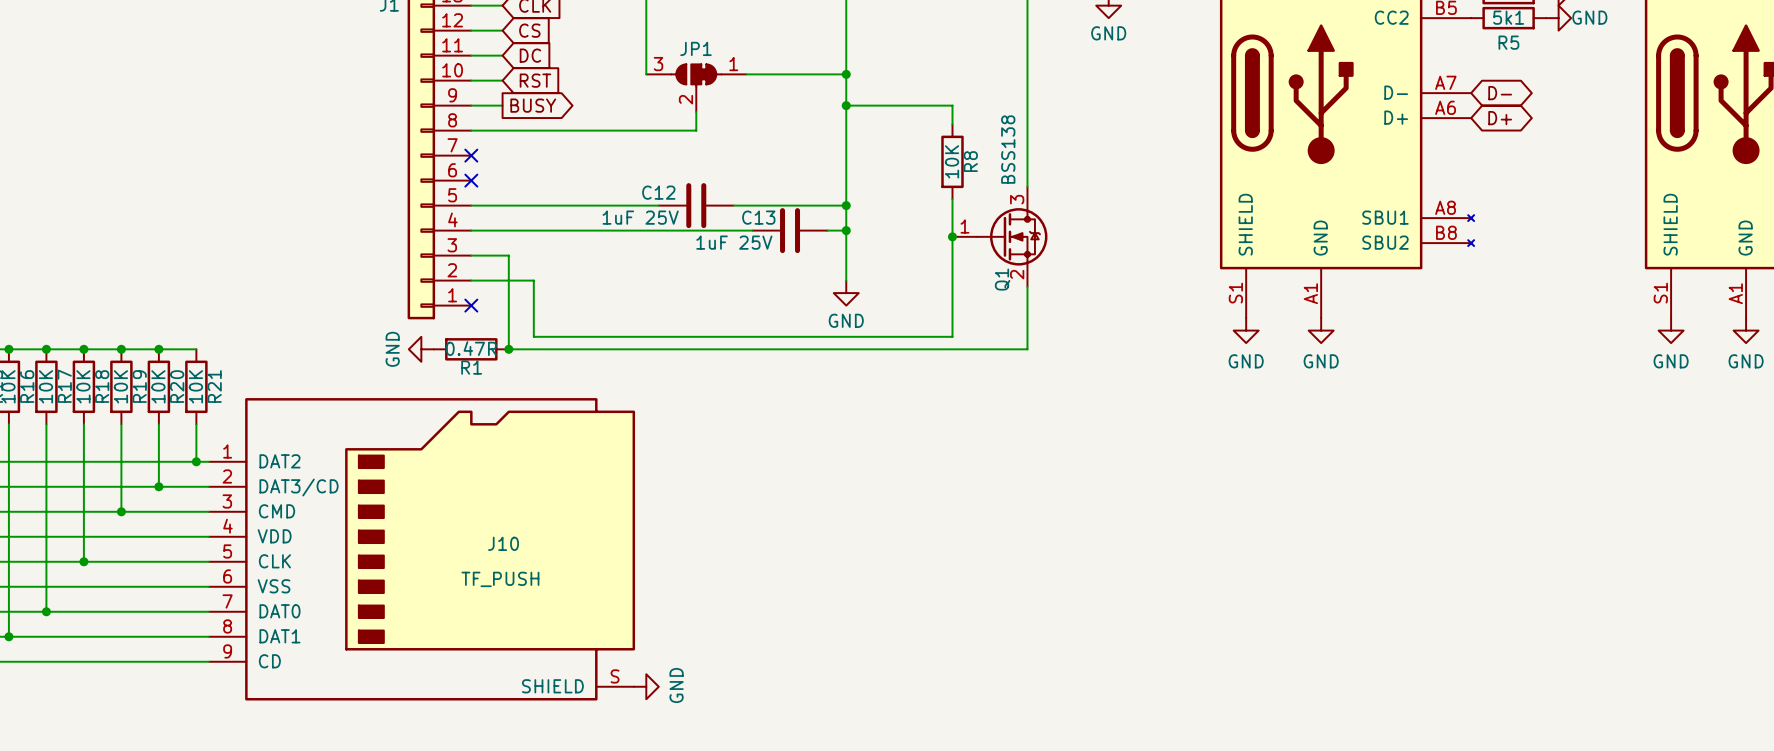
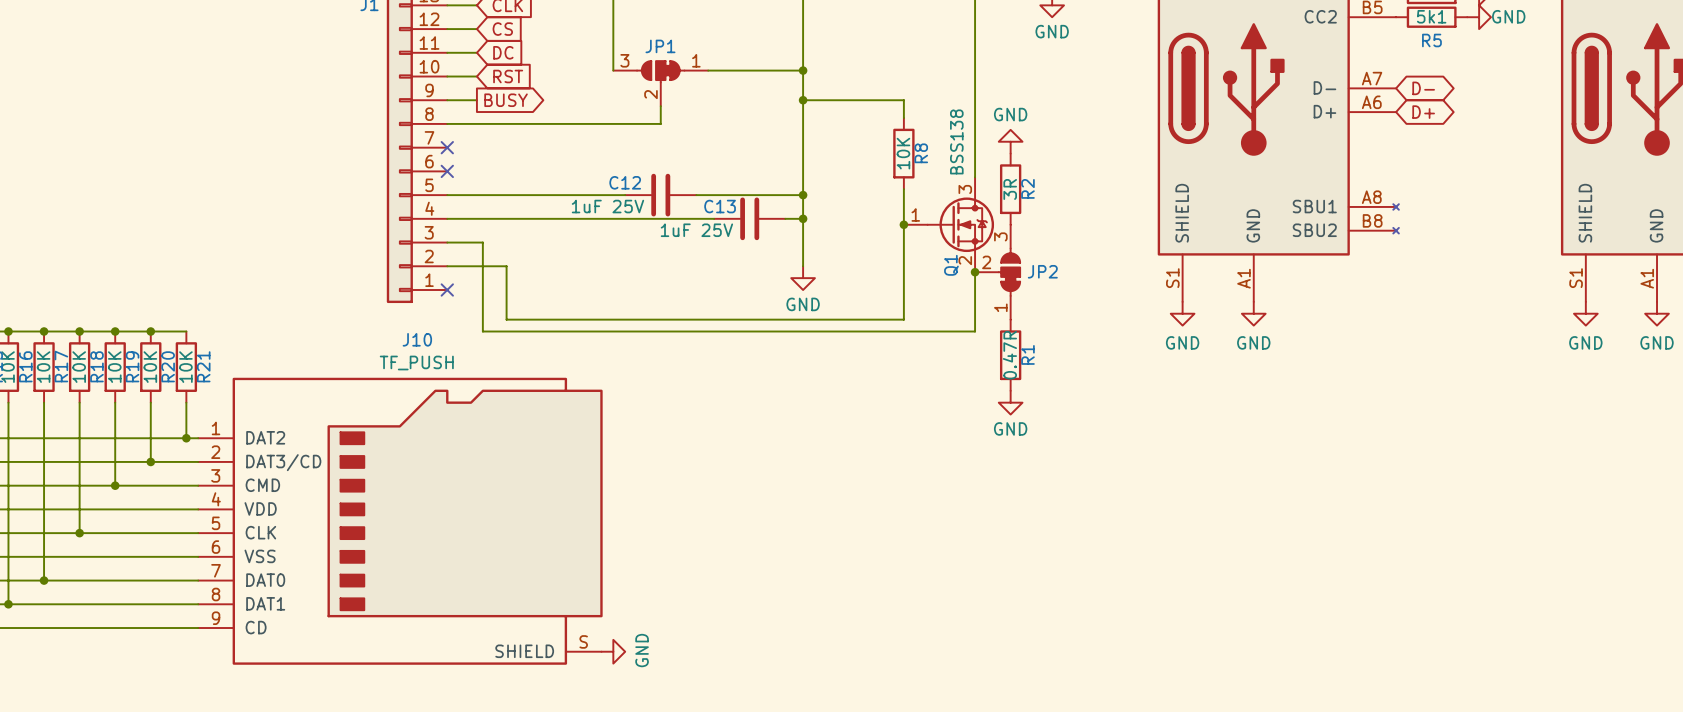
power symbol: none -> GND (1010, 141)
R2: none -> 3R (1010, 189)
junction: none -> (975, 272)
JP2: none -> (997, 272)
power symbol: GND (421, 349) -> none
R1 rotation: 0° (471, 349) -> 90° clockwise (1010, 355)
R1 position: (471, 349) -> (1010, 355)
junction: (508, 349) -> none
R1 name position: R1 (471, 367) -> R1 (1027, 354)
power symbol: none -> GND (1010, 402)
J10 name position: J10 (503, 543) -> J10 (417, 339)
J10 value position: TF_PUSH (500, 579) -> TF_PUSH (416, 363)

